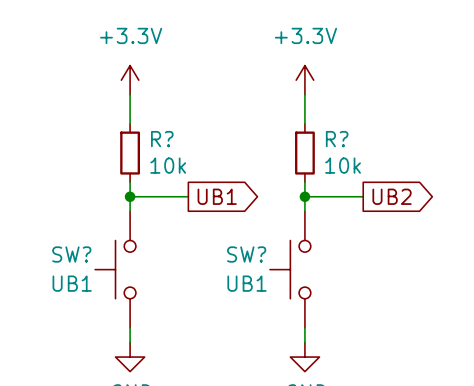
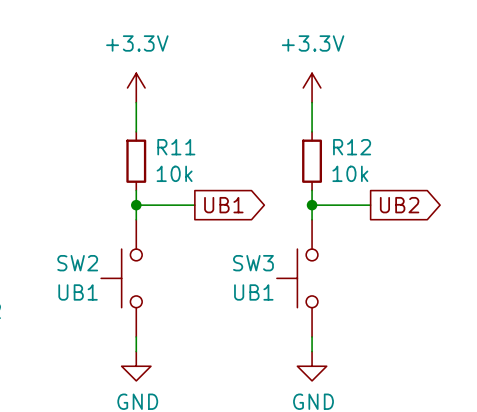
R? name: R? (162, 139) -> R11 (176, 147)
R? name: R? (337, 139) -> R12 (352, 147)
SW? name: SW? (71, 254) -> SW2 (77, 263)
SW? name: SW? (246, 254) -> SW3 (253, 263)

